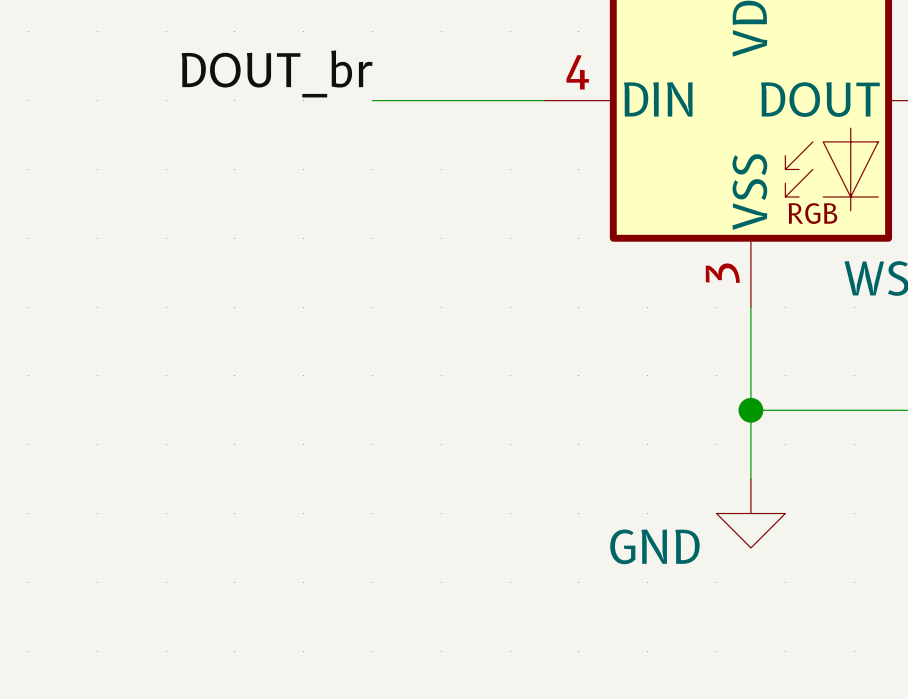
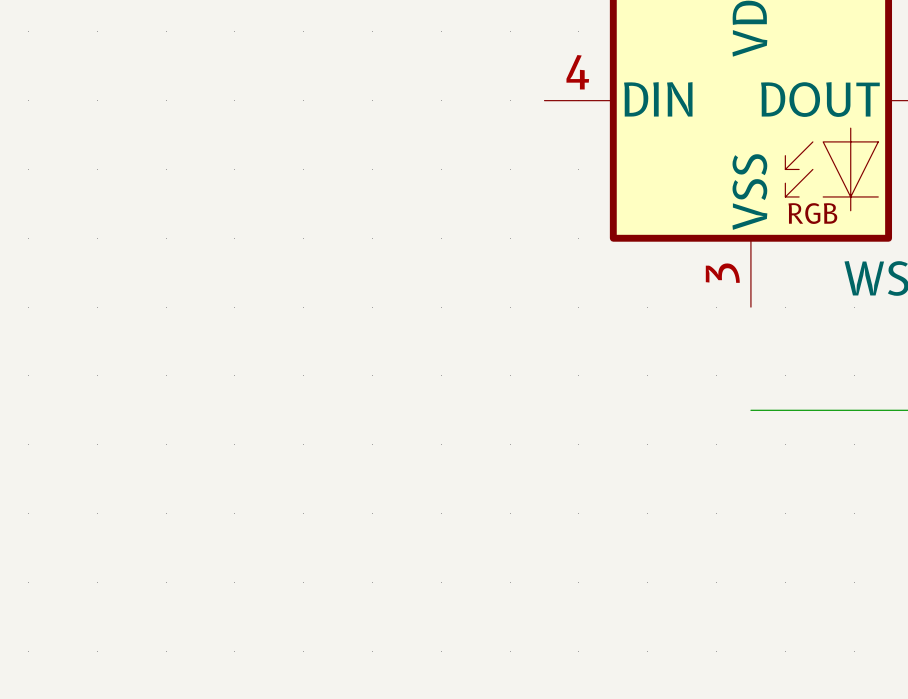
label: DOUT_br (277, 73) -> none
wire: (372, 100) (544, 100) -> none
wire: (750, 307) (750, 479) -> none
junction: (750, 410) -> none
power symbol: GND (750, 513) -> none

